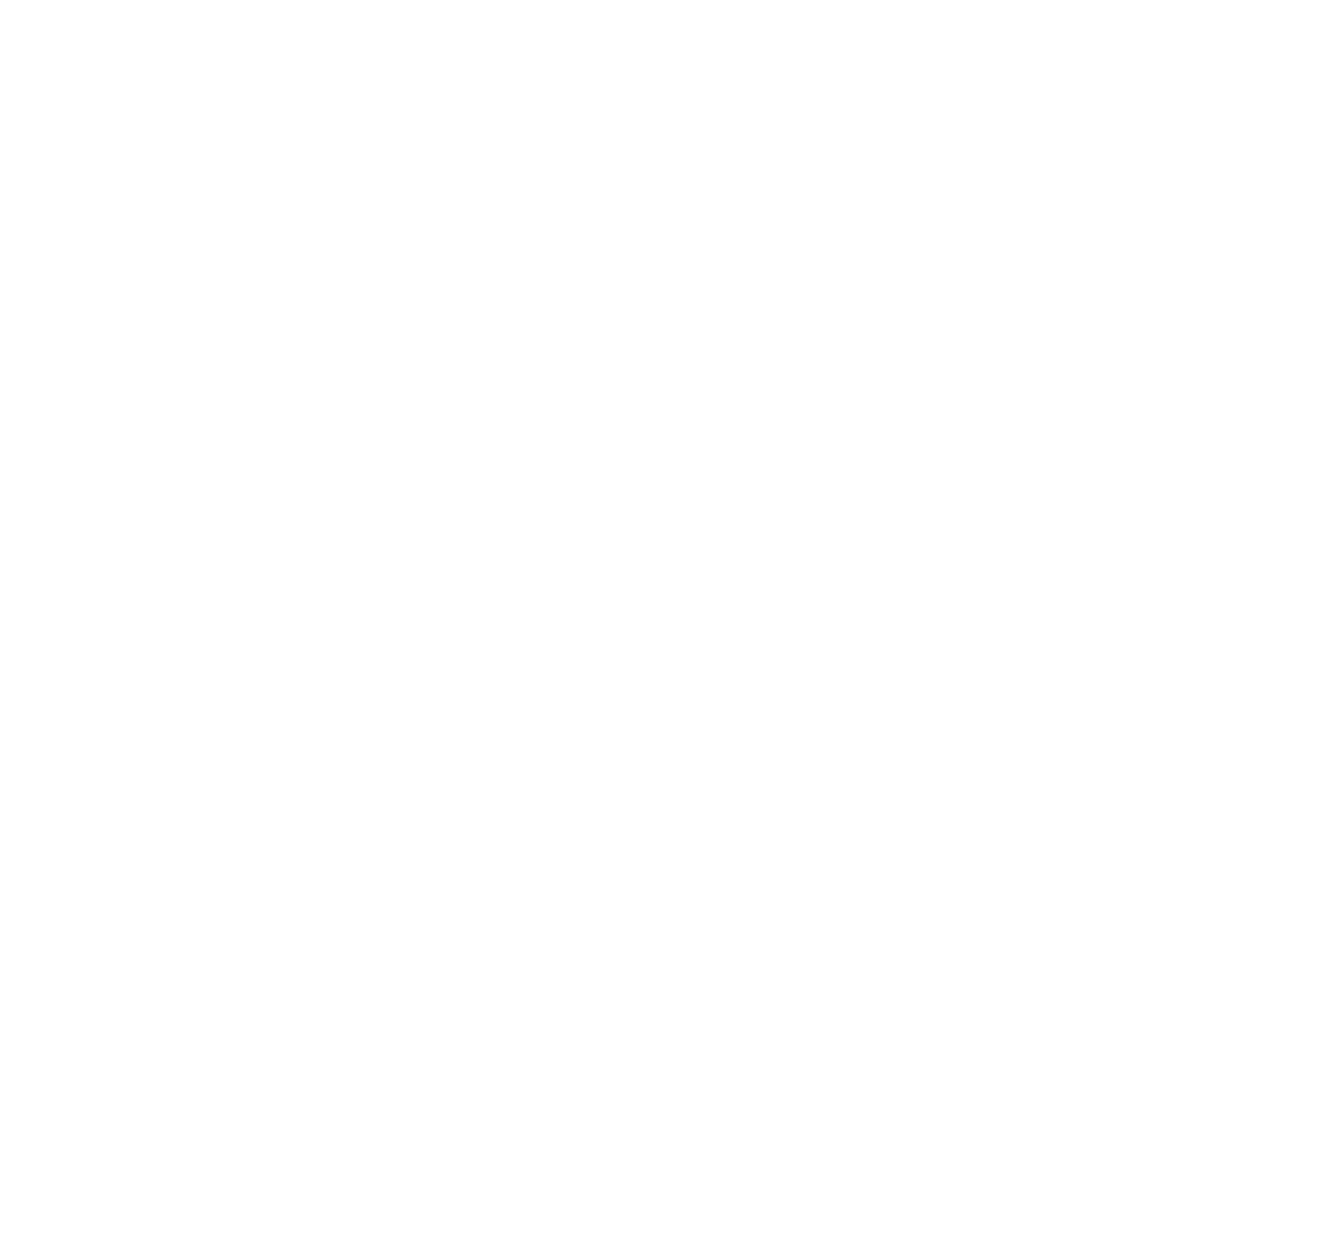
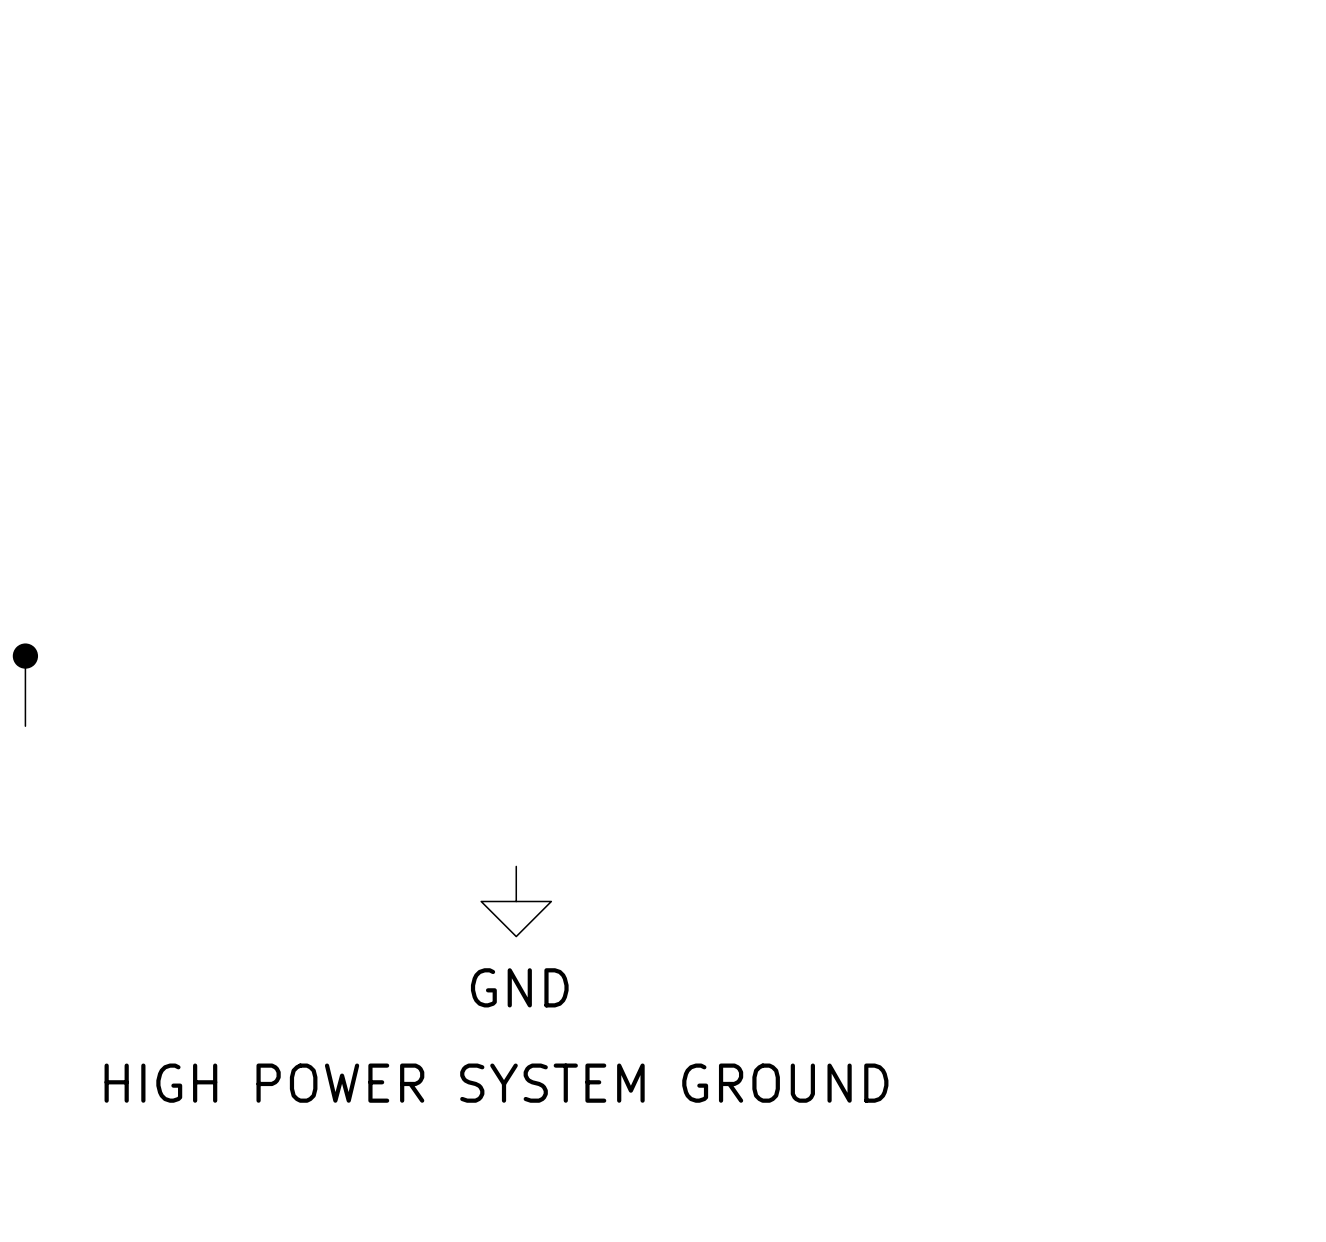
wire: none -> (25, 656) (25, 726)
junction: none -> (25, 656)
power symbol: none -> GND (516, 901)
text: none -> HIGH POWER SYSTEM GROUND (496, 1083)

